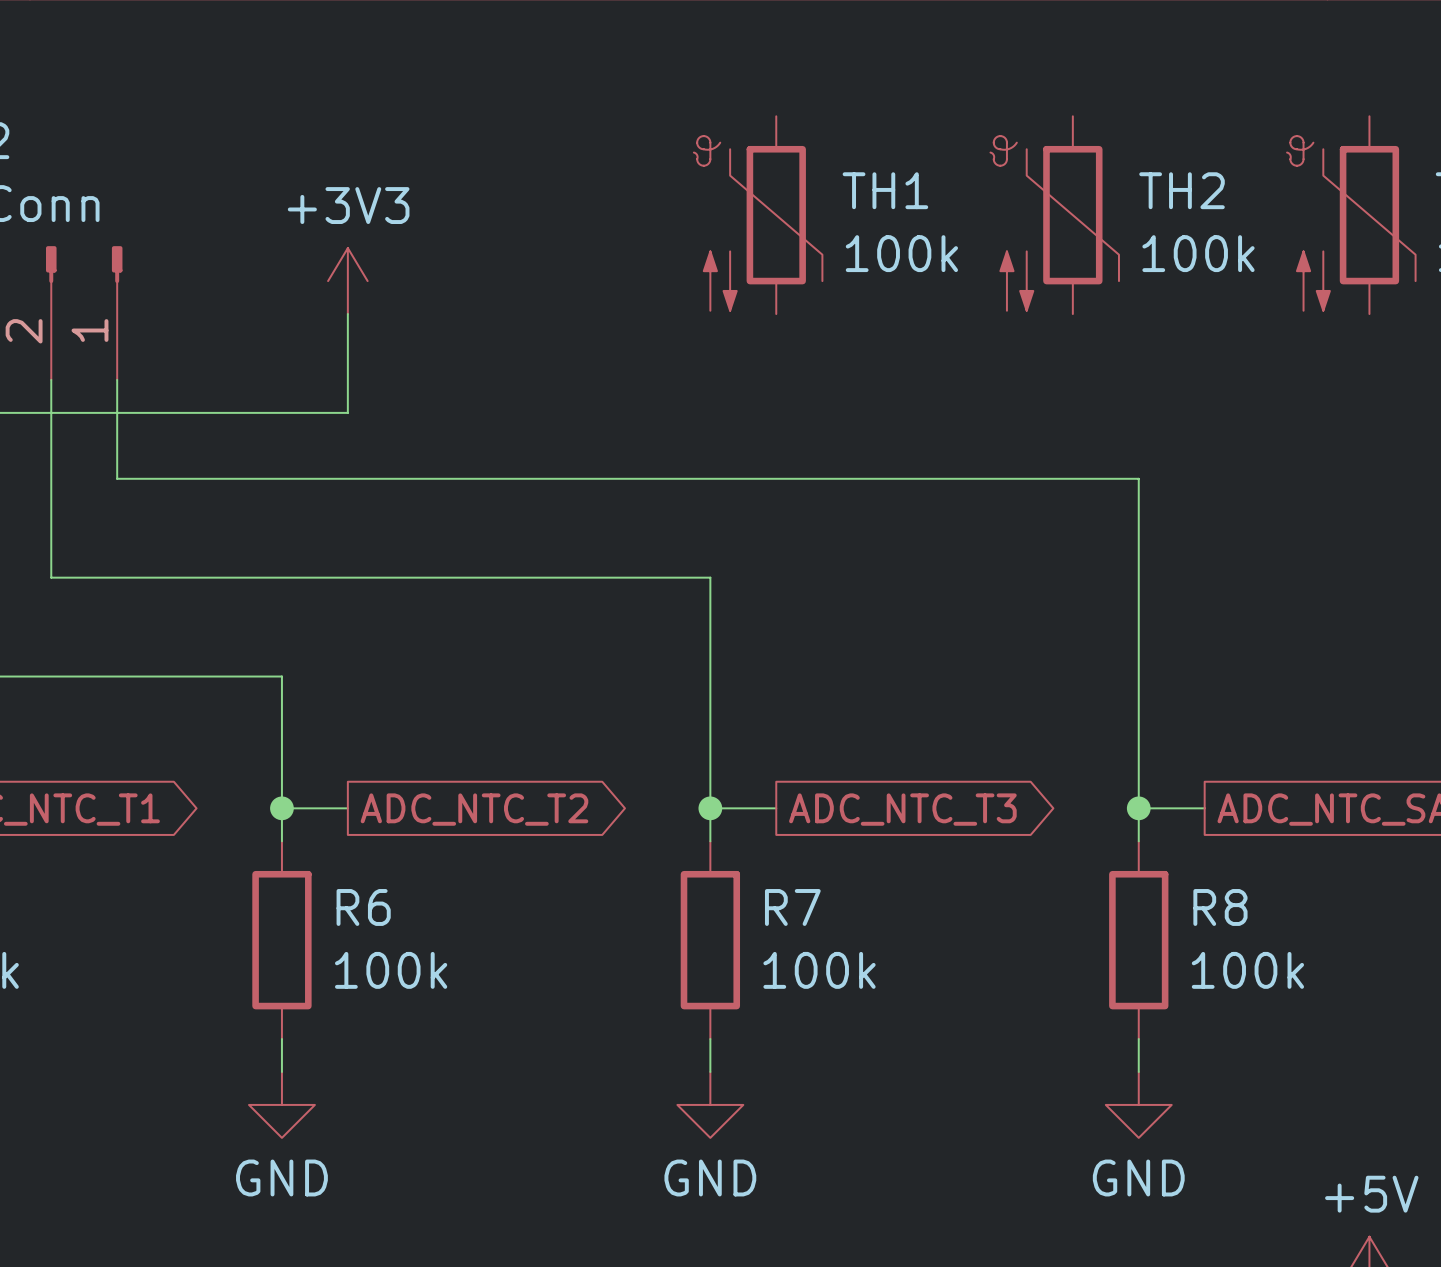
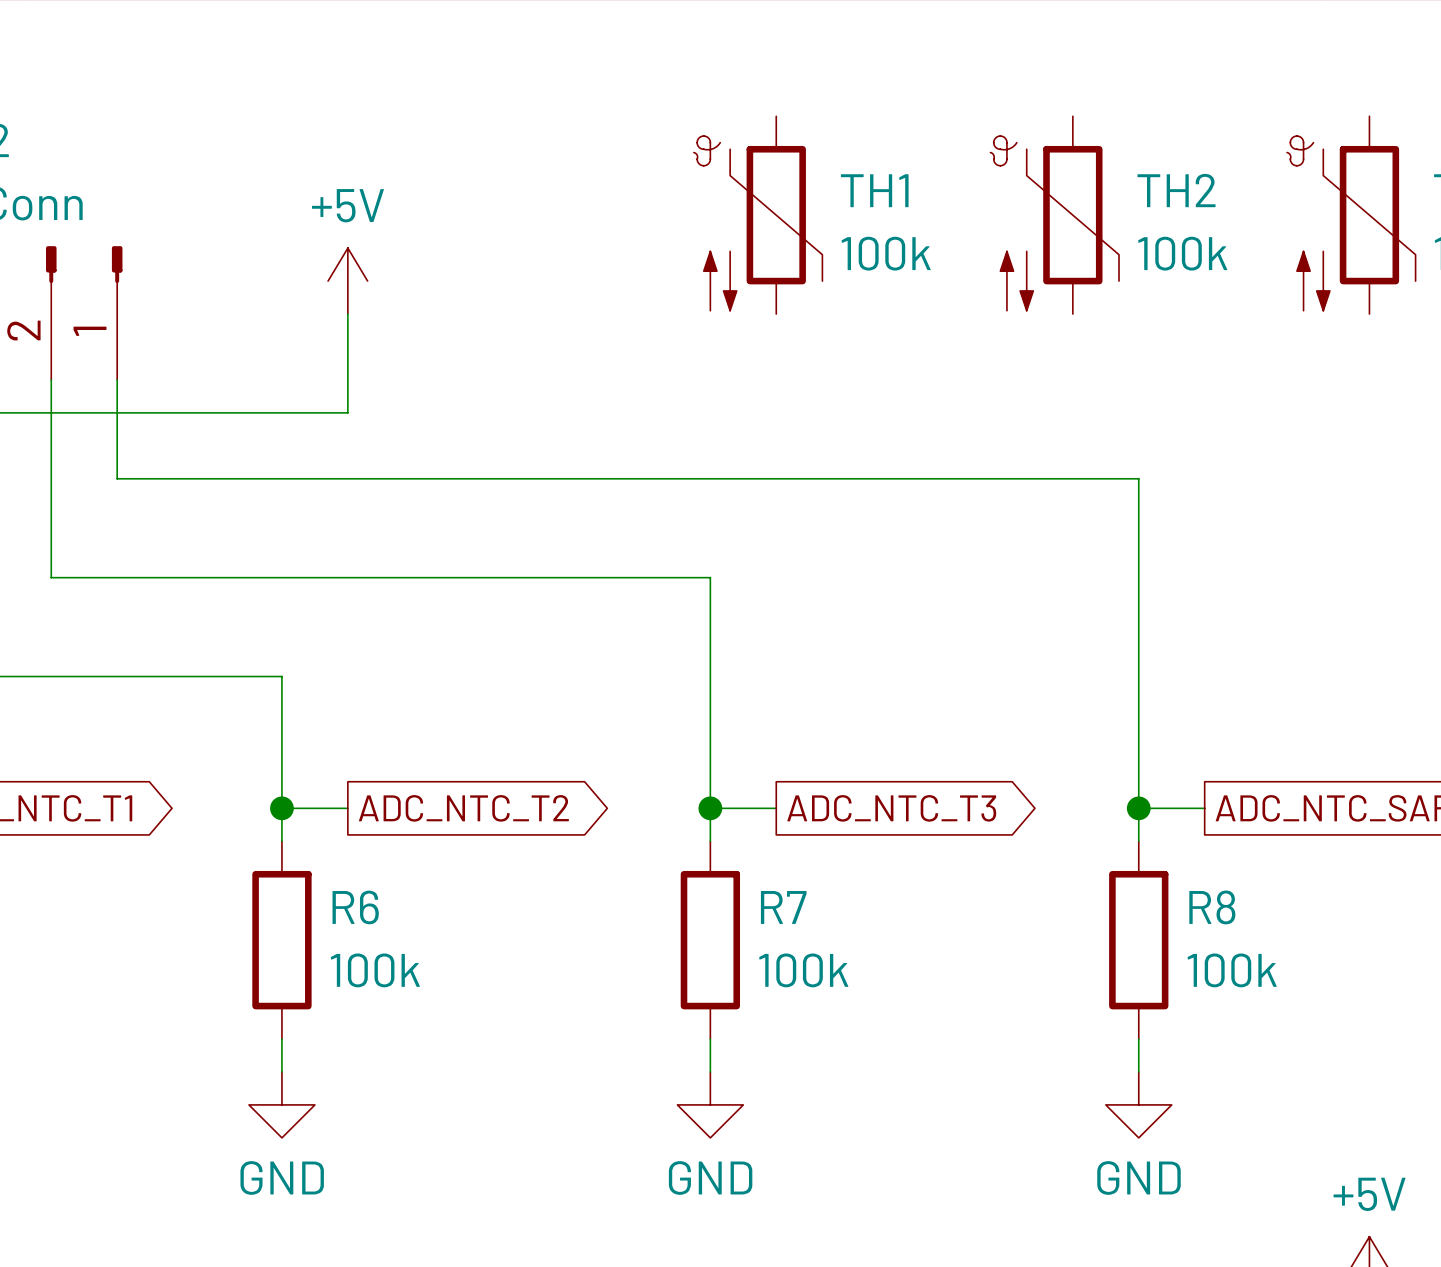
power symbol: +3V3 (347, 281) -> +5V (347, 281)

